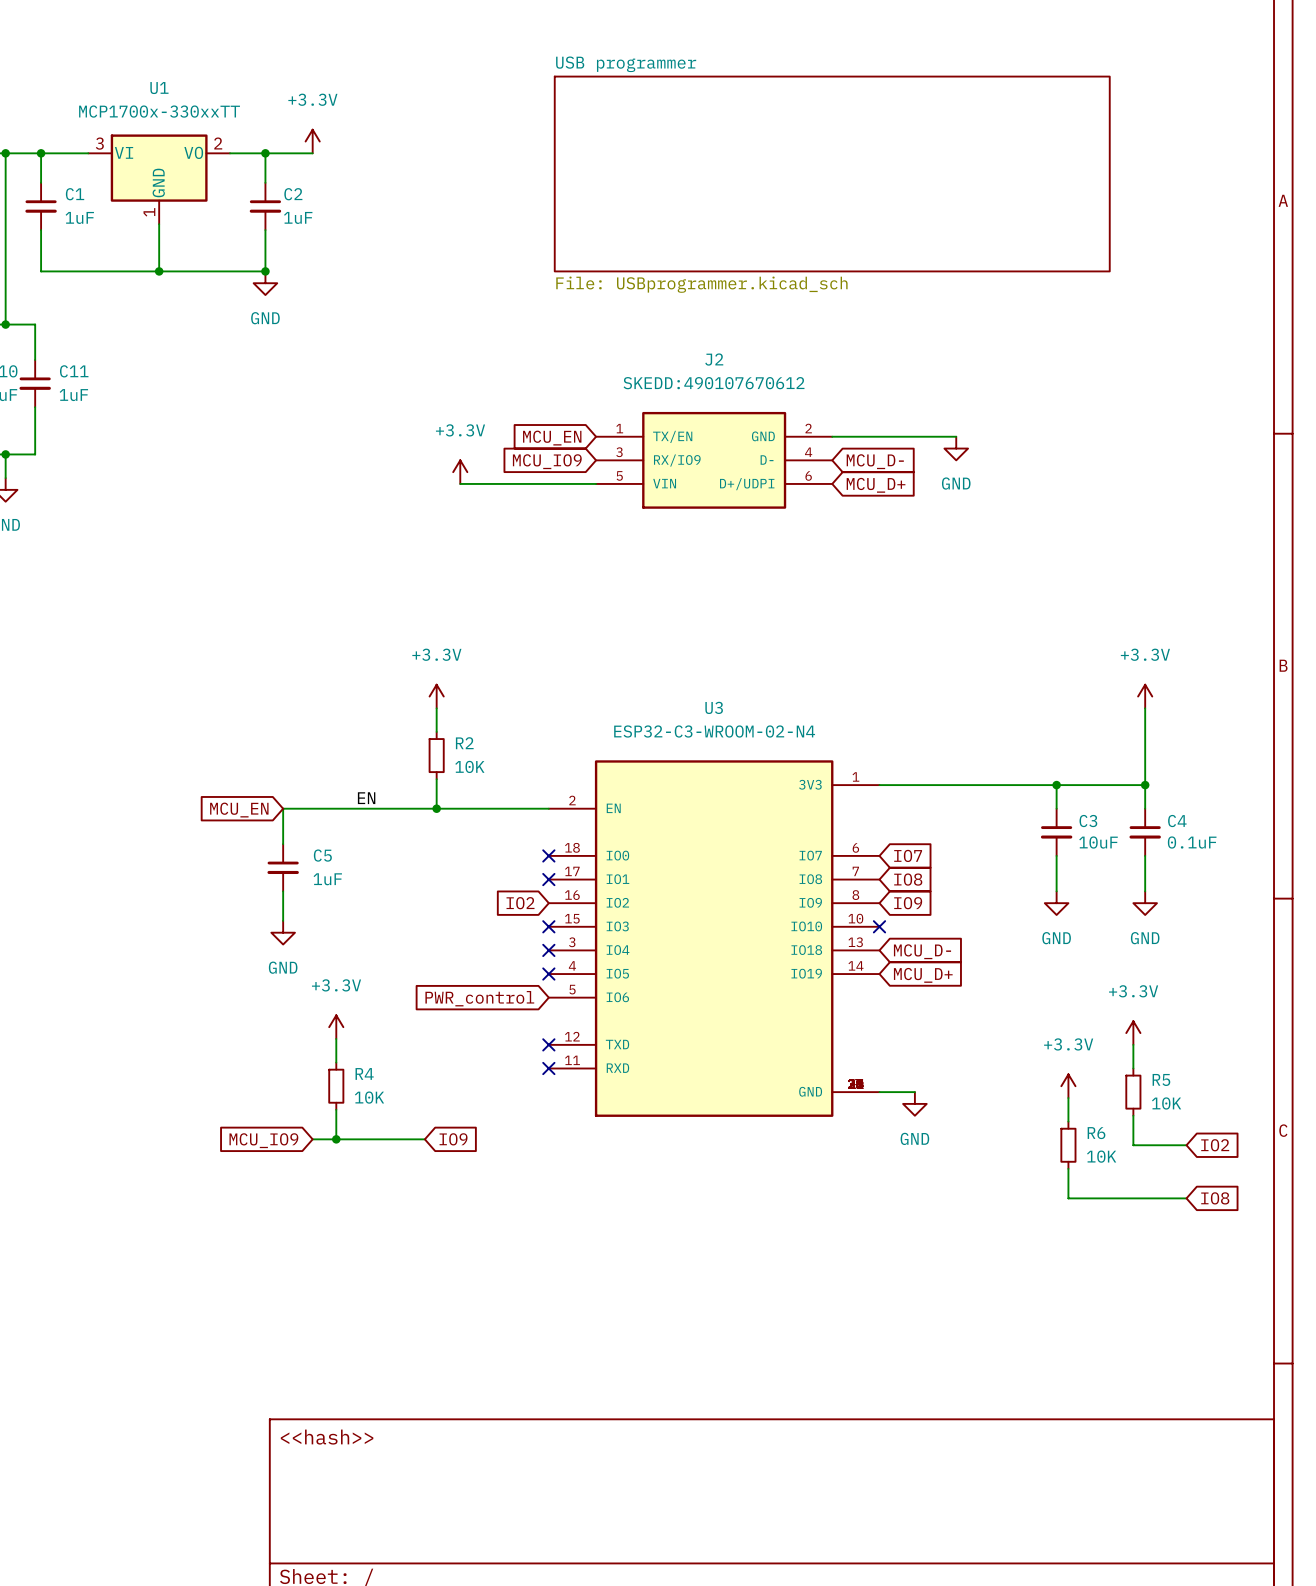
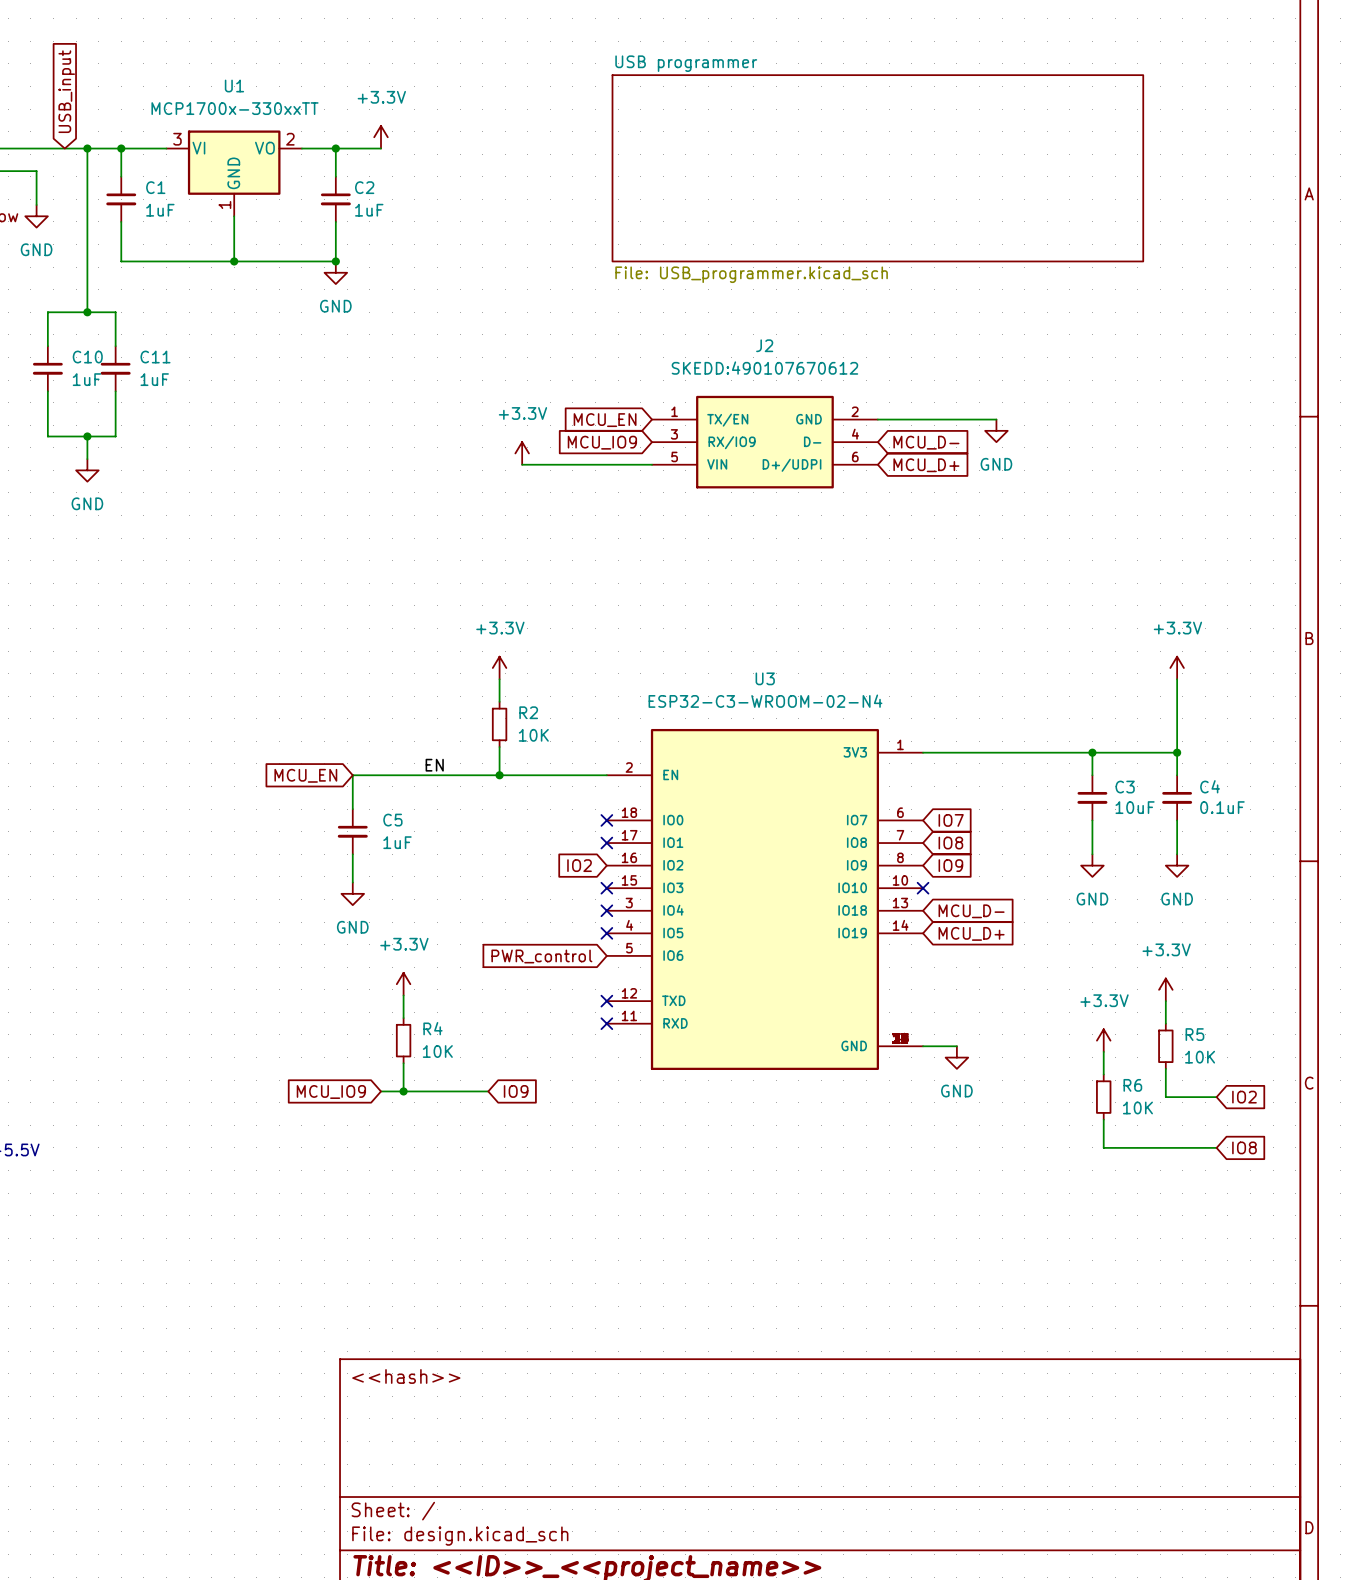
sheet USB programmer value: File: USBprogrammer.kicad_sch (701, 284) -> File: USB_programmer.kicad_sch (751, 274)

